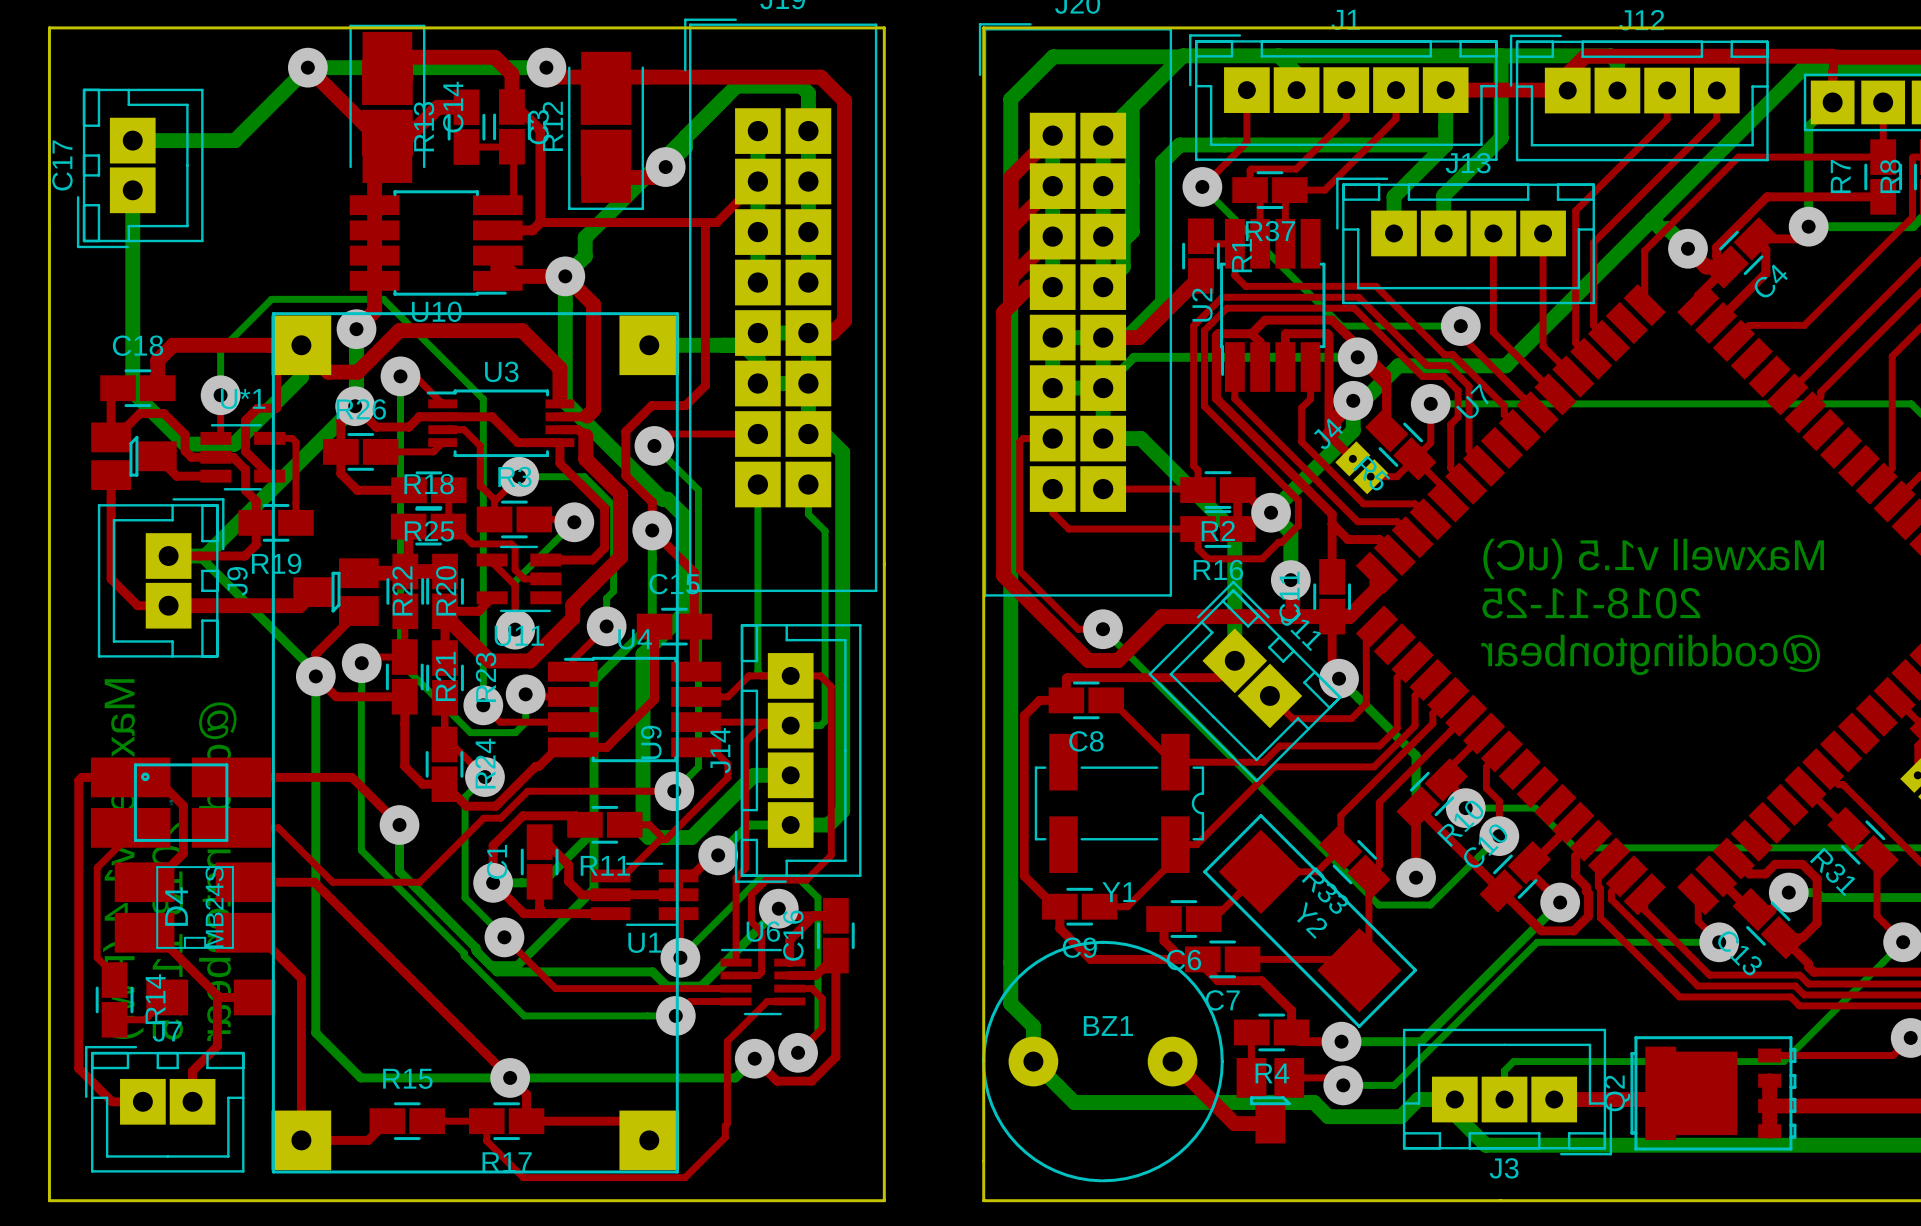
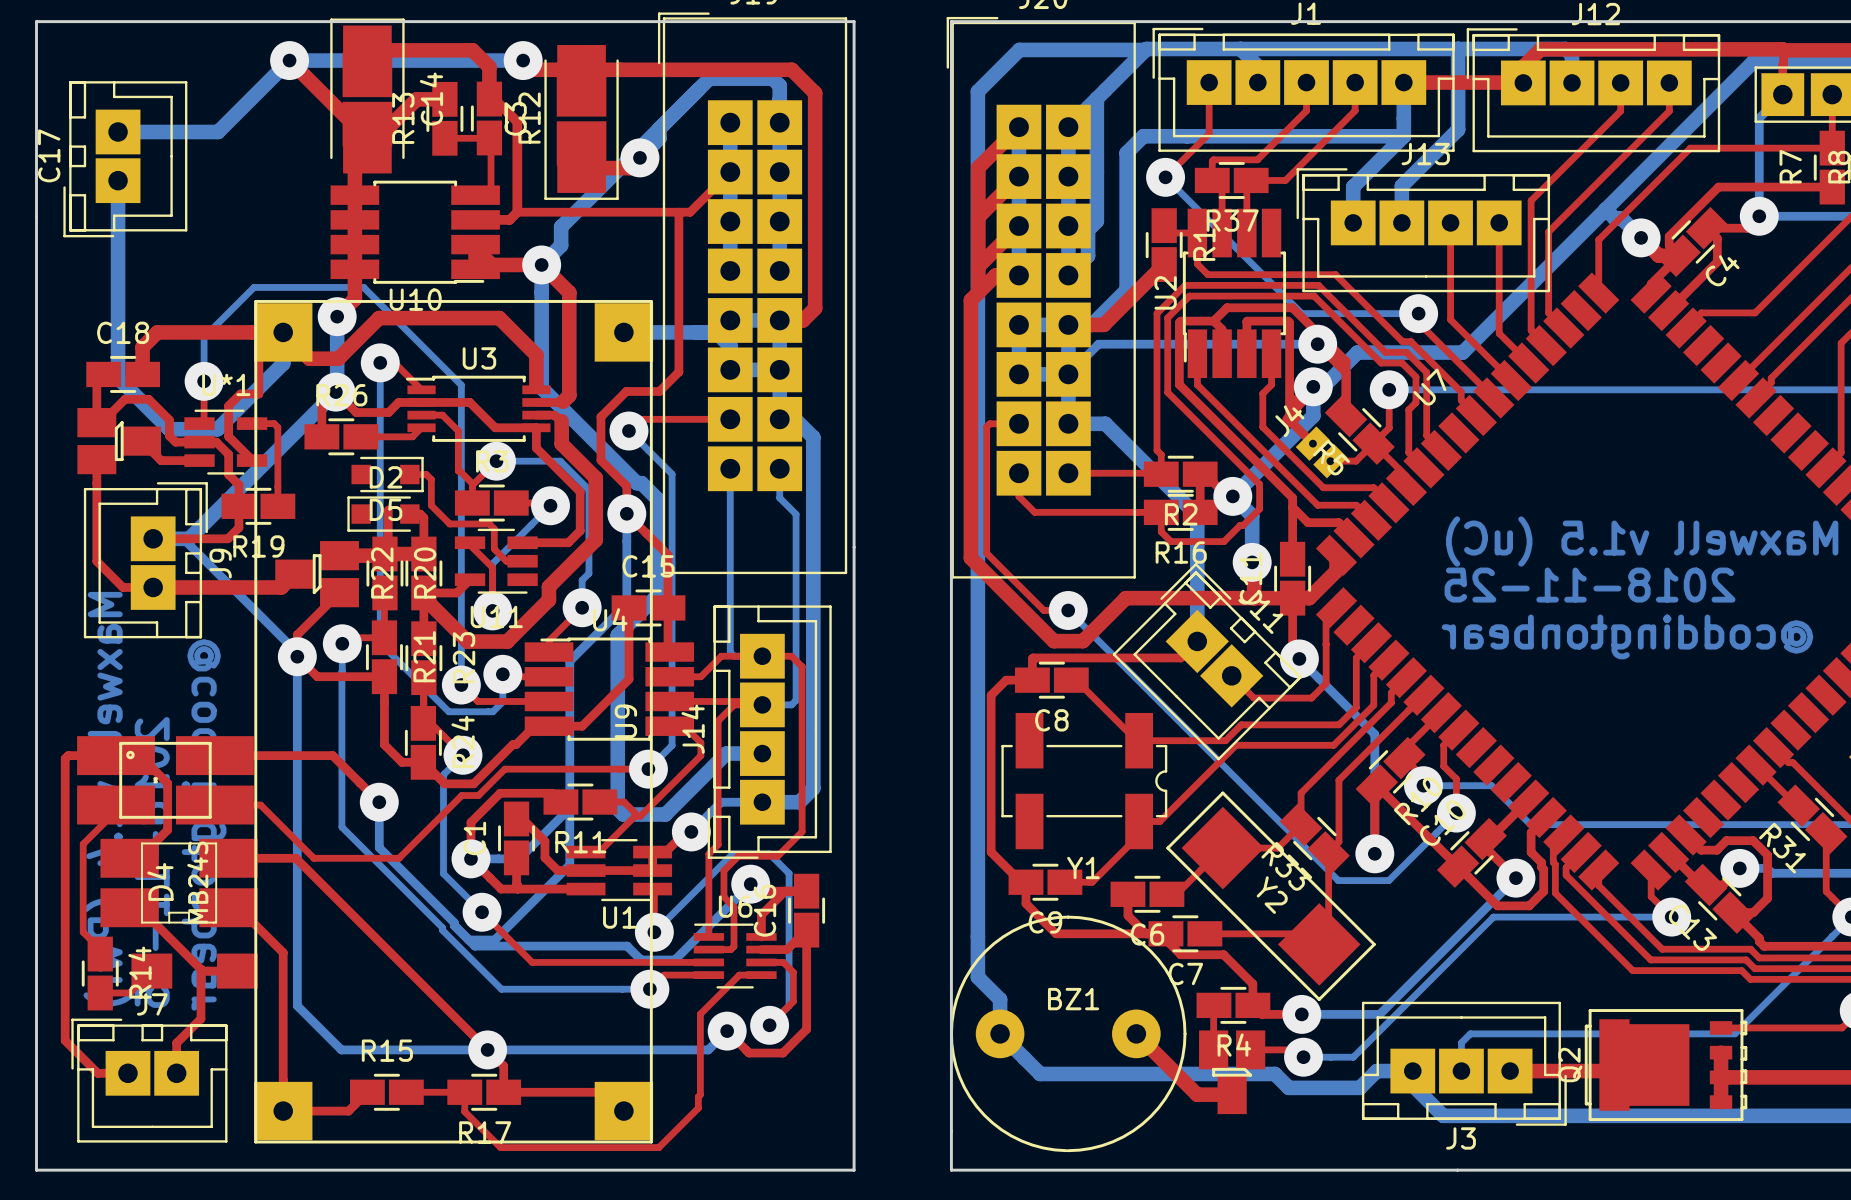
top track: (340, 451) (340, 473) (357, 490) (409, 490) -> none
D5: none -> (387, 474)
R25: (428, 490) -> none
top track: (448, 490) (448, 526) (454, 526) (472, 543) (511, 543) (515, 547) (515, 569) (524, 578) (529, 578) -> (409, 474) (426, 474) (431, 479) (431, 505) (449, 523) (489, 523) (494, 528) (494, 549) (506, 561)
R18: (428, 526) -> none
D2: none -> (383, 514)
top track: none -> (409, 514) (420, 514) (423, 517) (423, 554)

